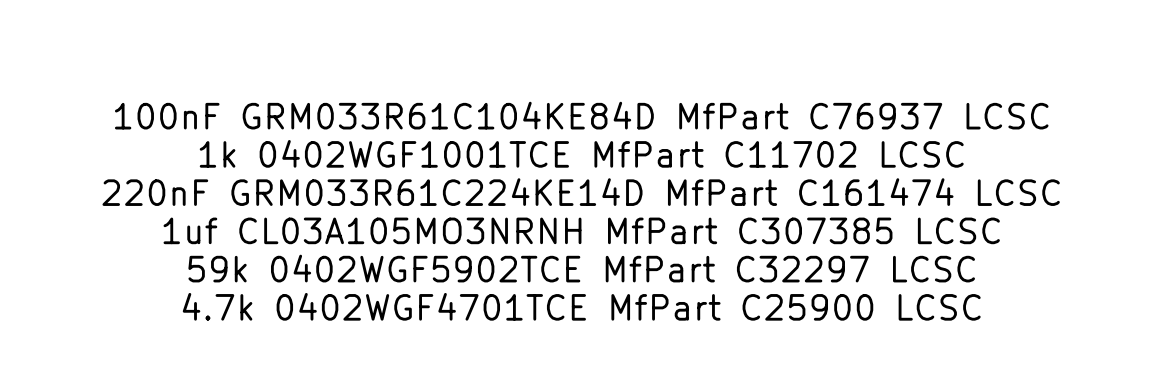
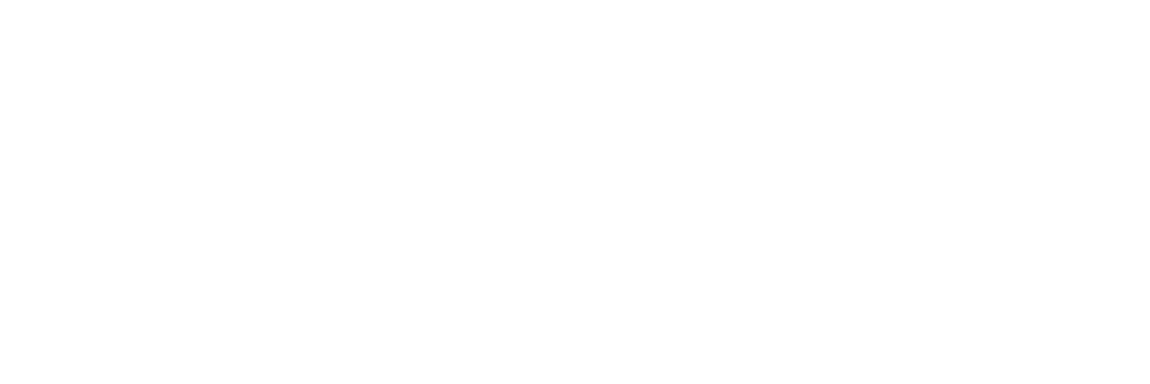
text: 100nF GRM033R61C104KE84D MfPart C76937 LCSC (581, 115) -> none
text: 1k 0402WGF1001TCE MfPart C11702 LCSC (581, 153) -> none
text: 220nF GRM033R61C224KE14D MfPart C161474 LCSC (581, 192) -> none
text: 1uf CL03A105MO3NRNH MfPart C307385 LCSC (581, 230) -> none
text: 59k 0402WGF5902TCE MfPart C32297 LCSC (581, 268) -> none
text: 4.7k 0402WGF4701TCE MfPart C25900 LCSC (581, 306) -> none

